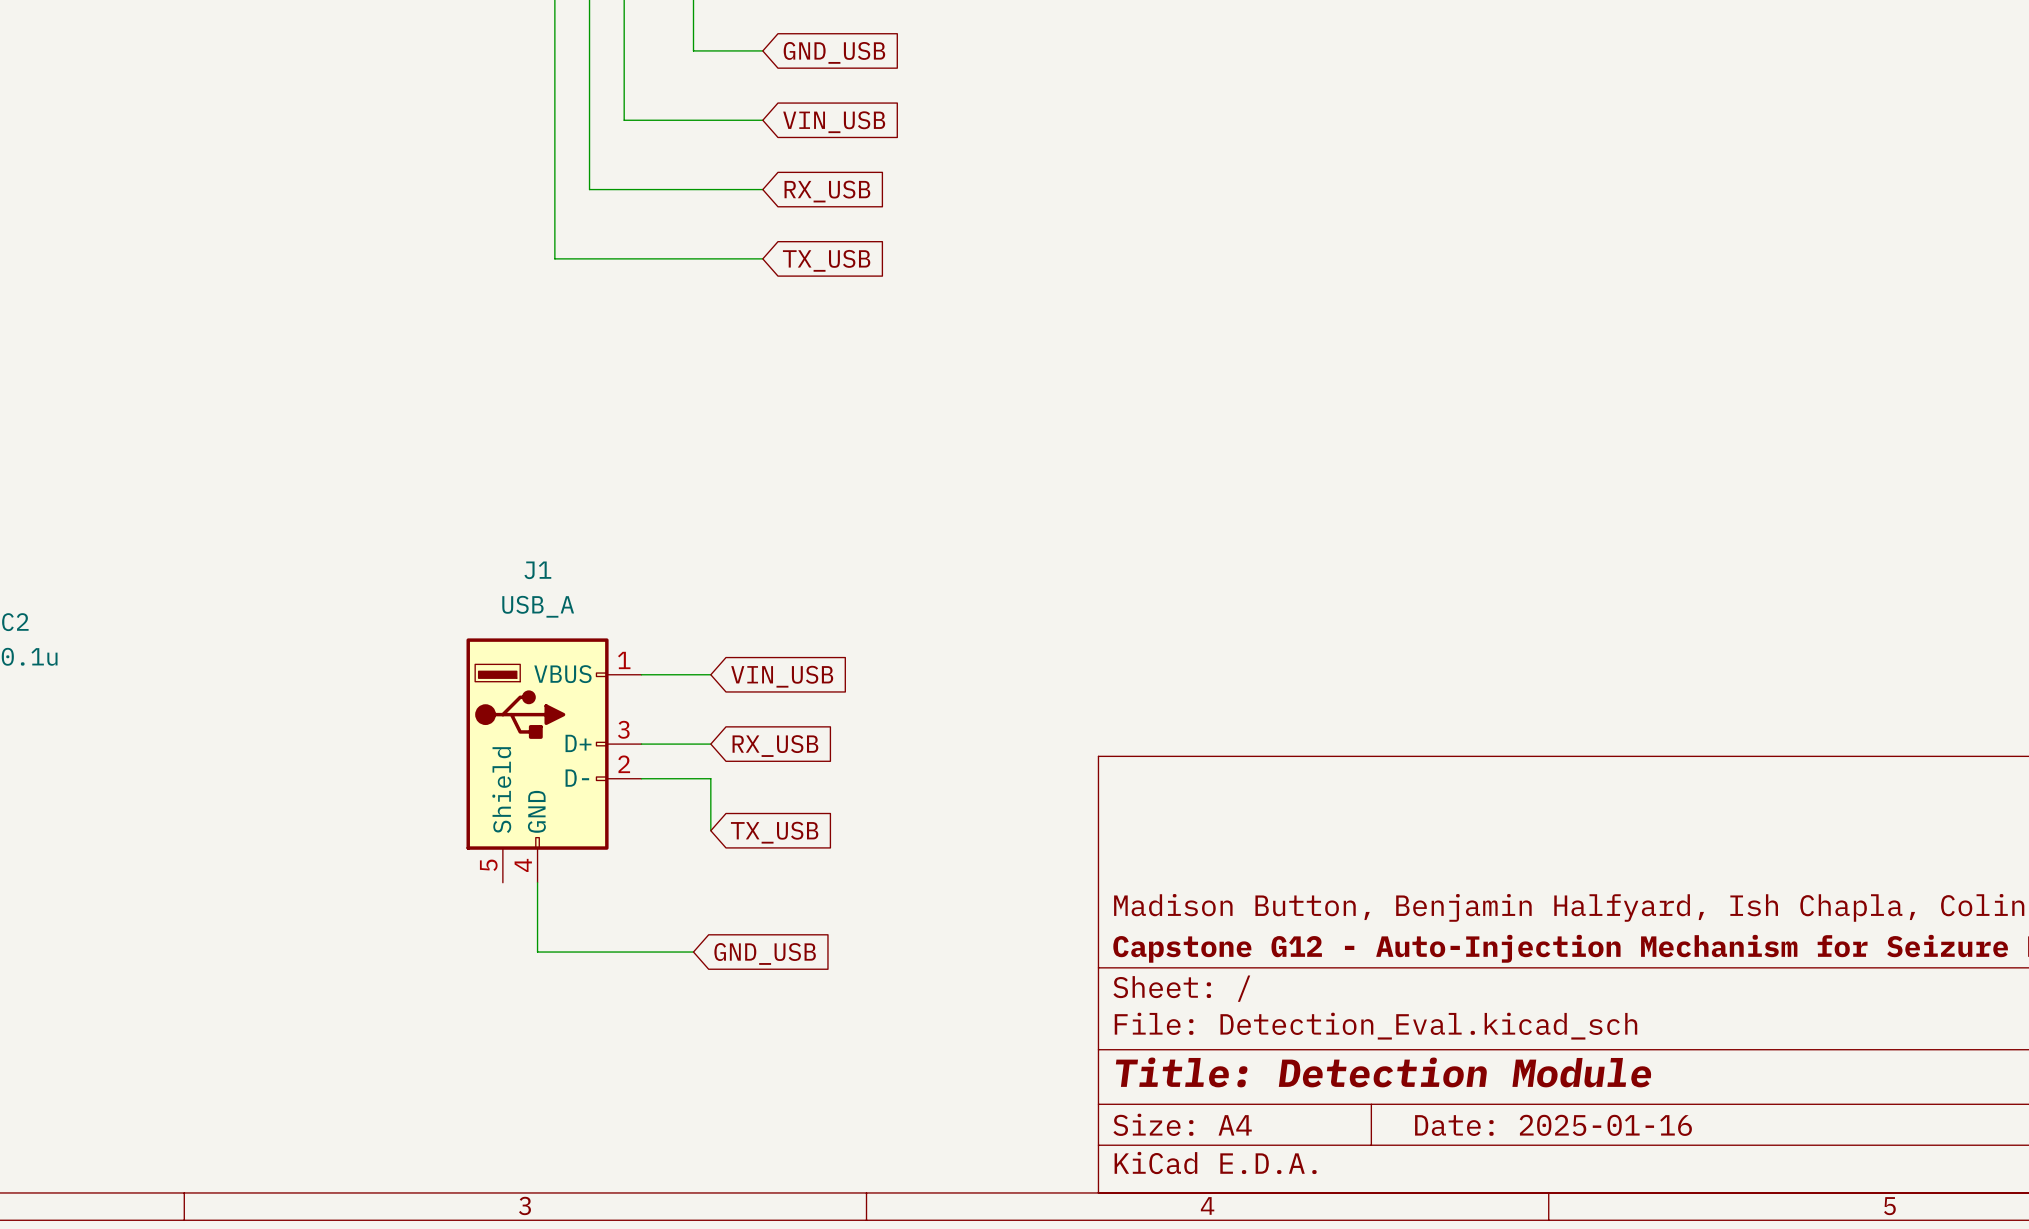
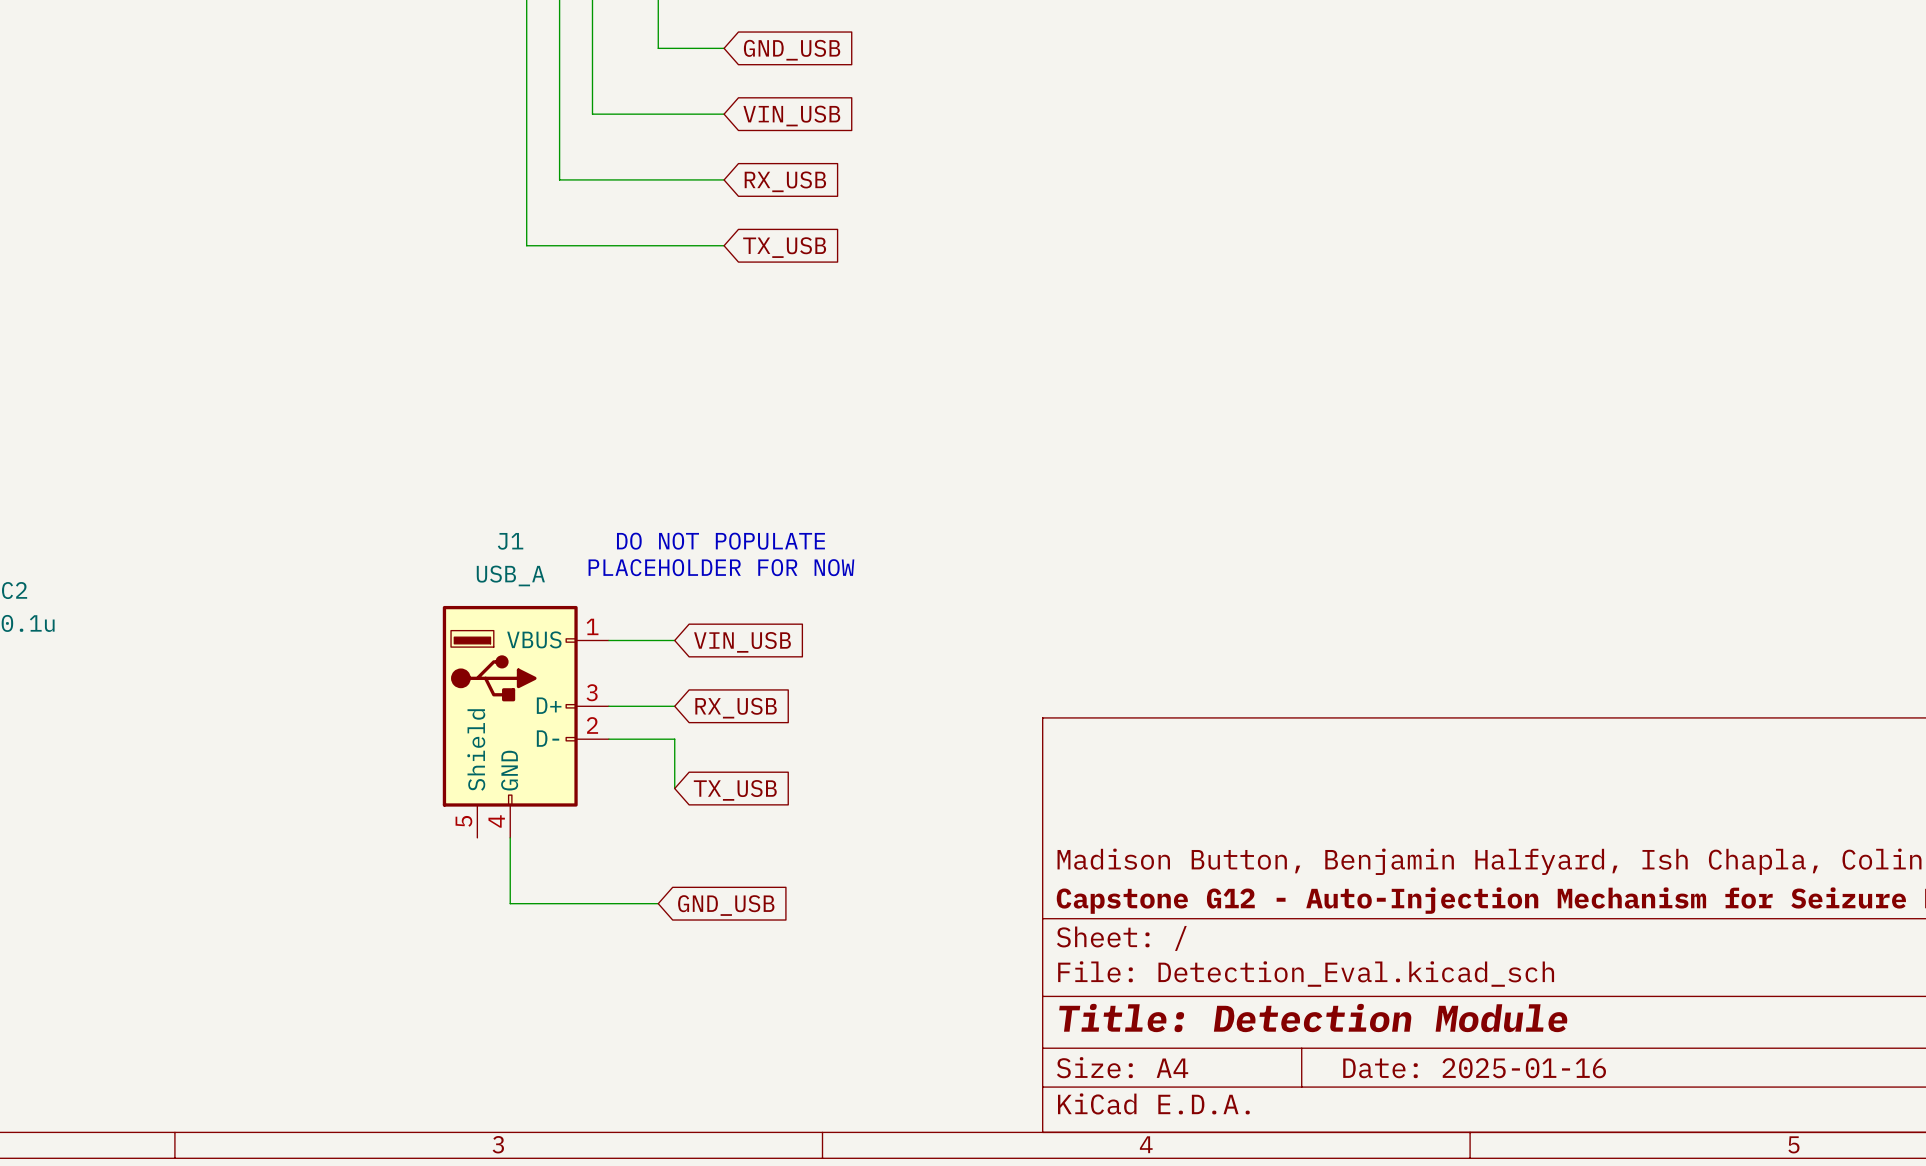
text: none -> DO NOT POPULATE (720, 541)
text: none -> PLACEHOLDER FOR NOW (721, 567)

